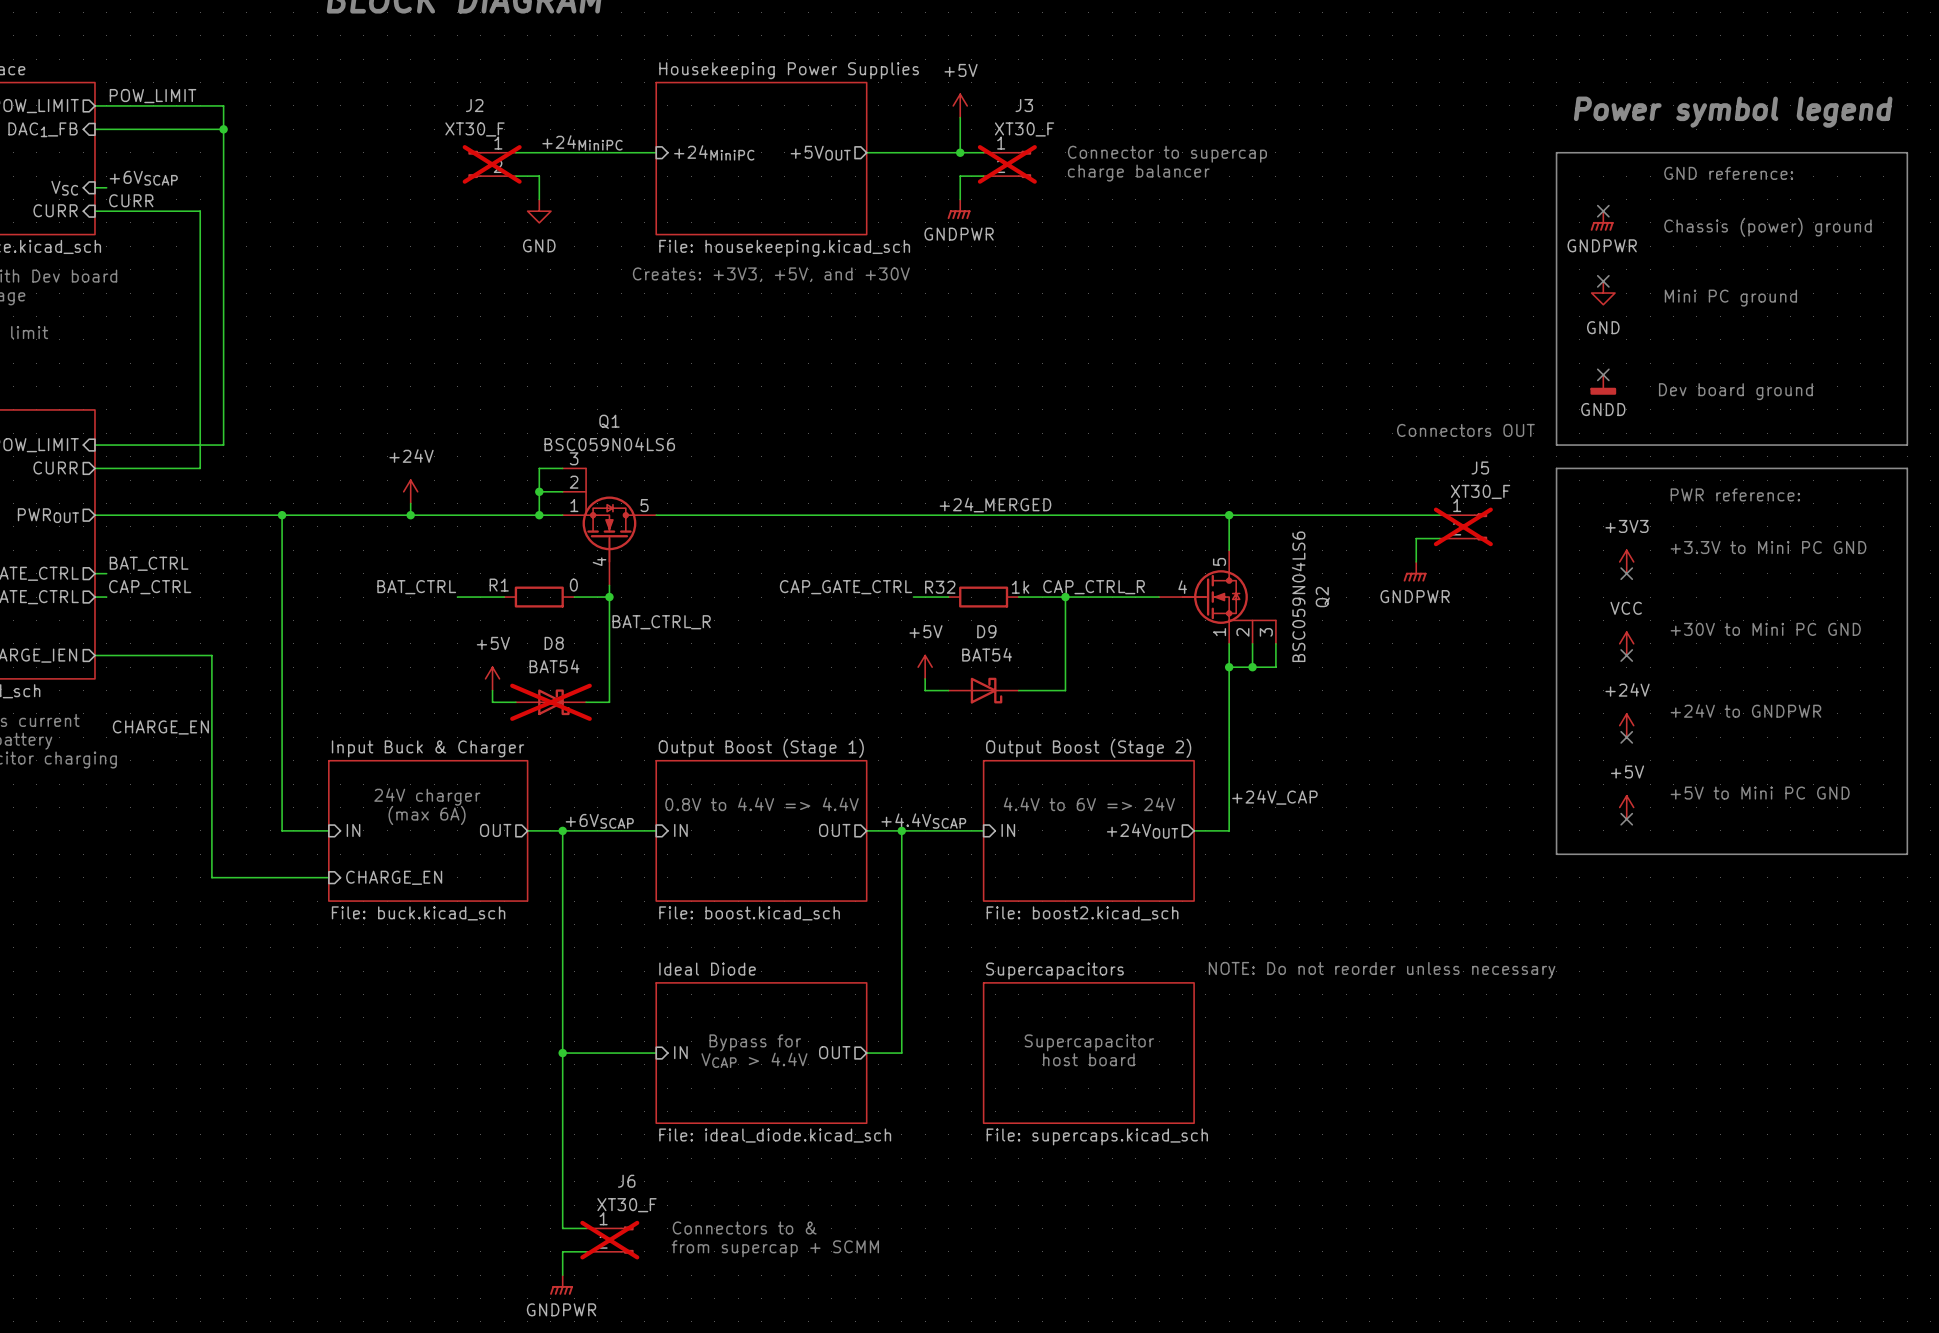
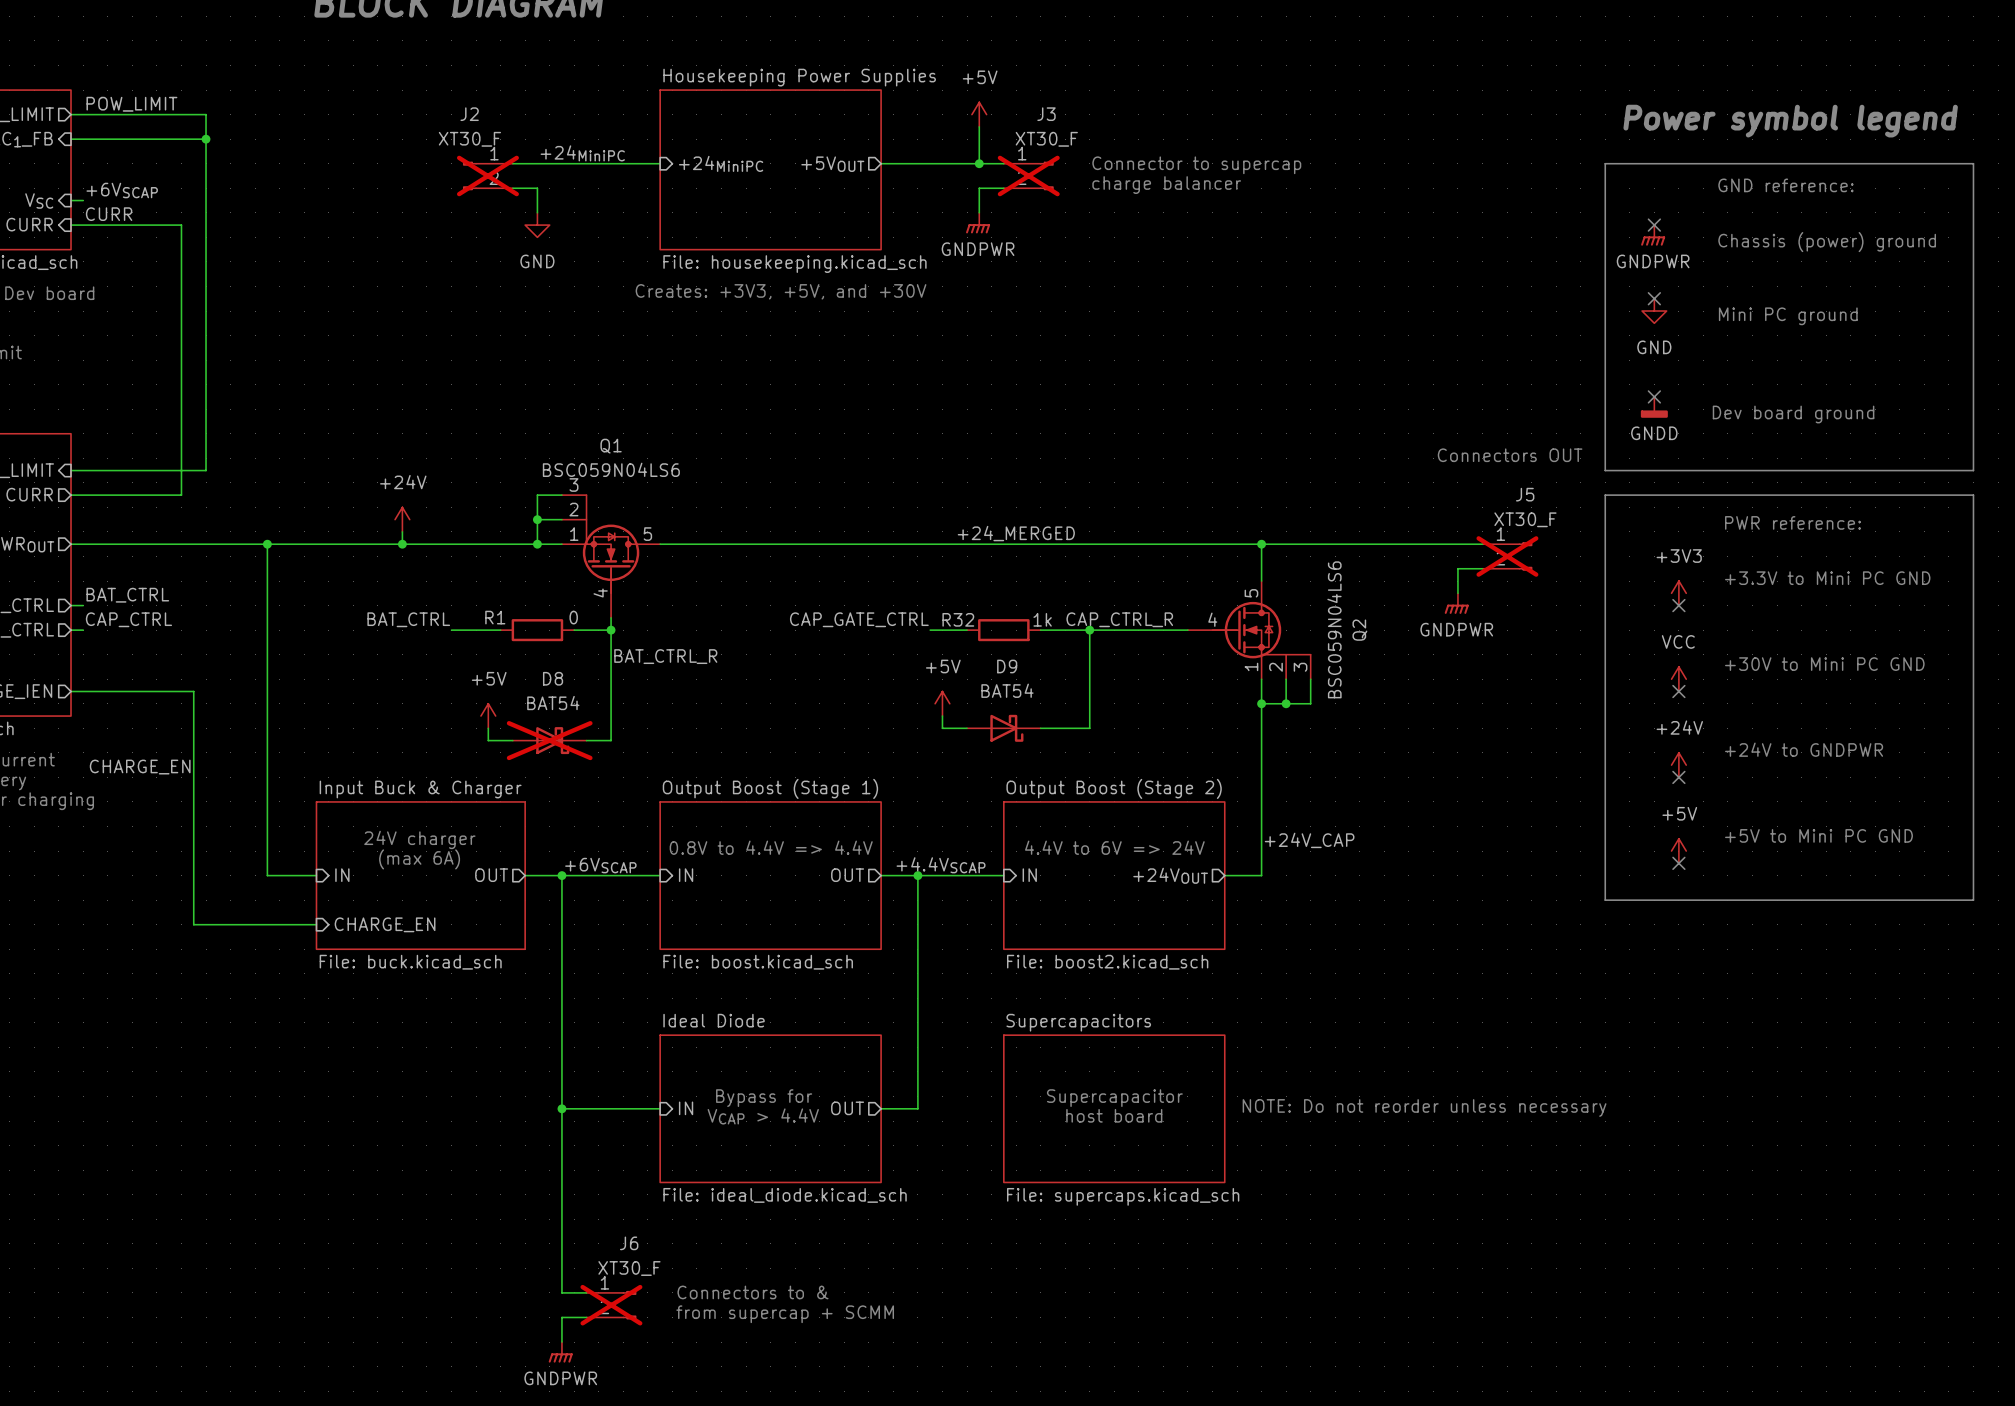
text position: NOTE: Do not reorder unless necessary (1382, 970) -> NOTE: Do not reorder unless necessary (1424, 1107)

